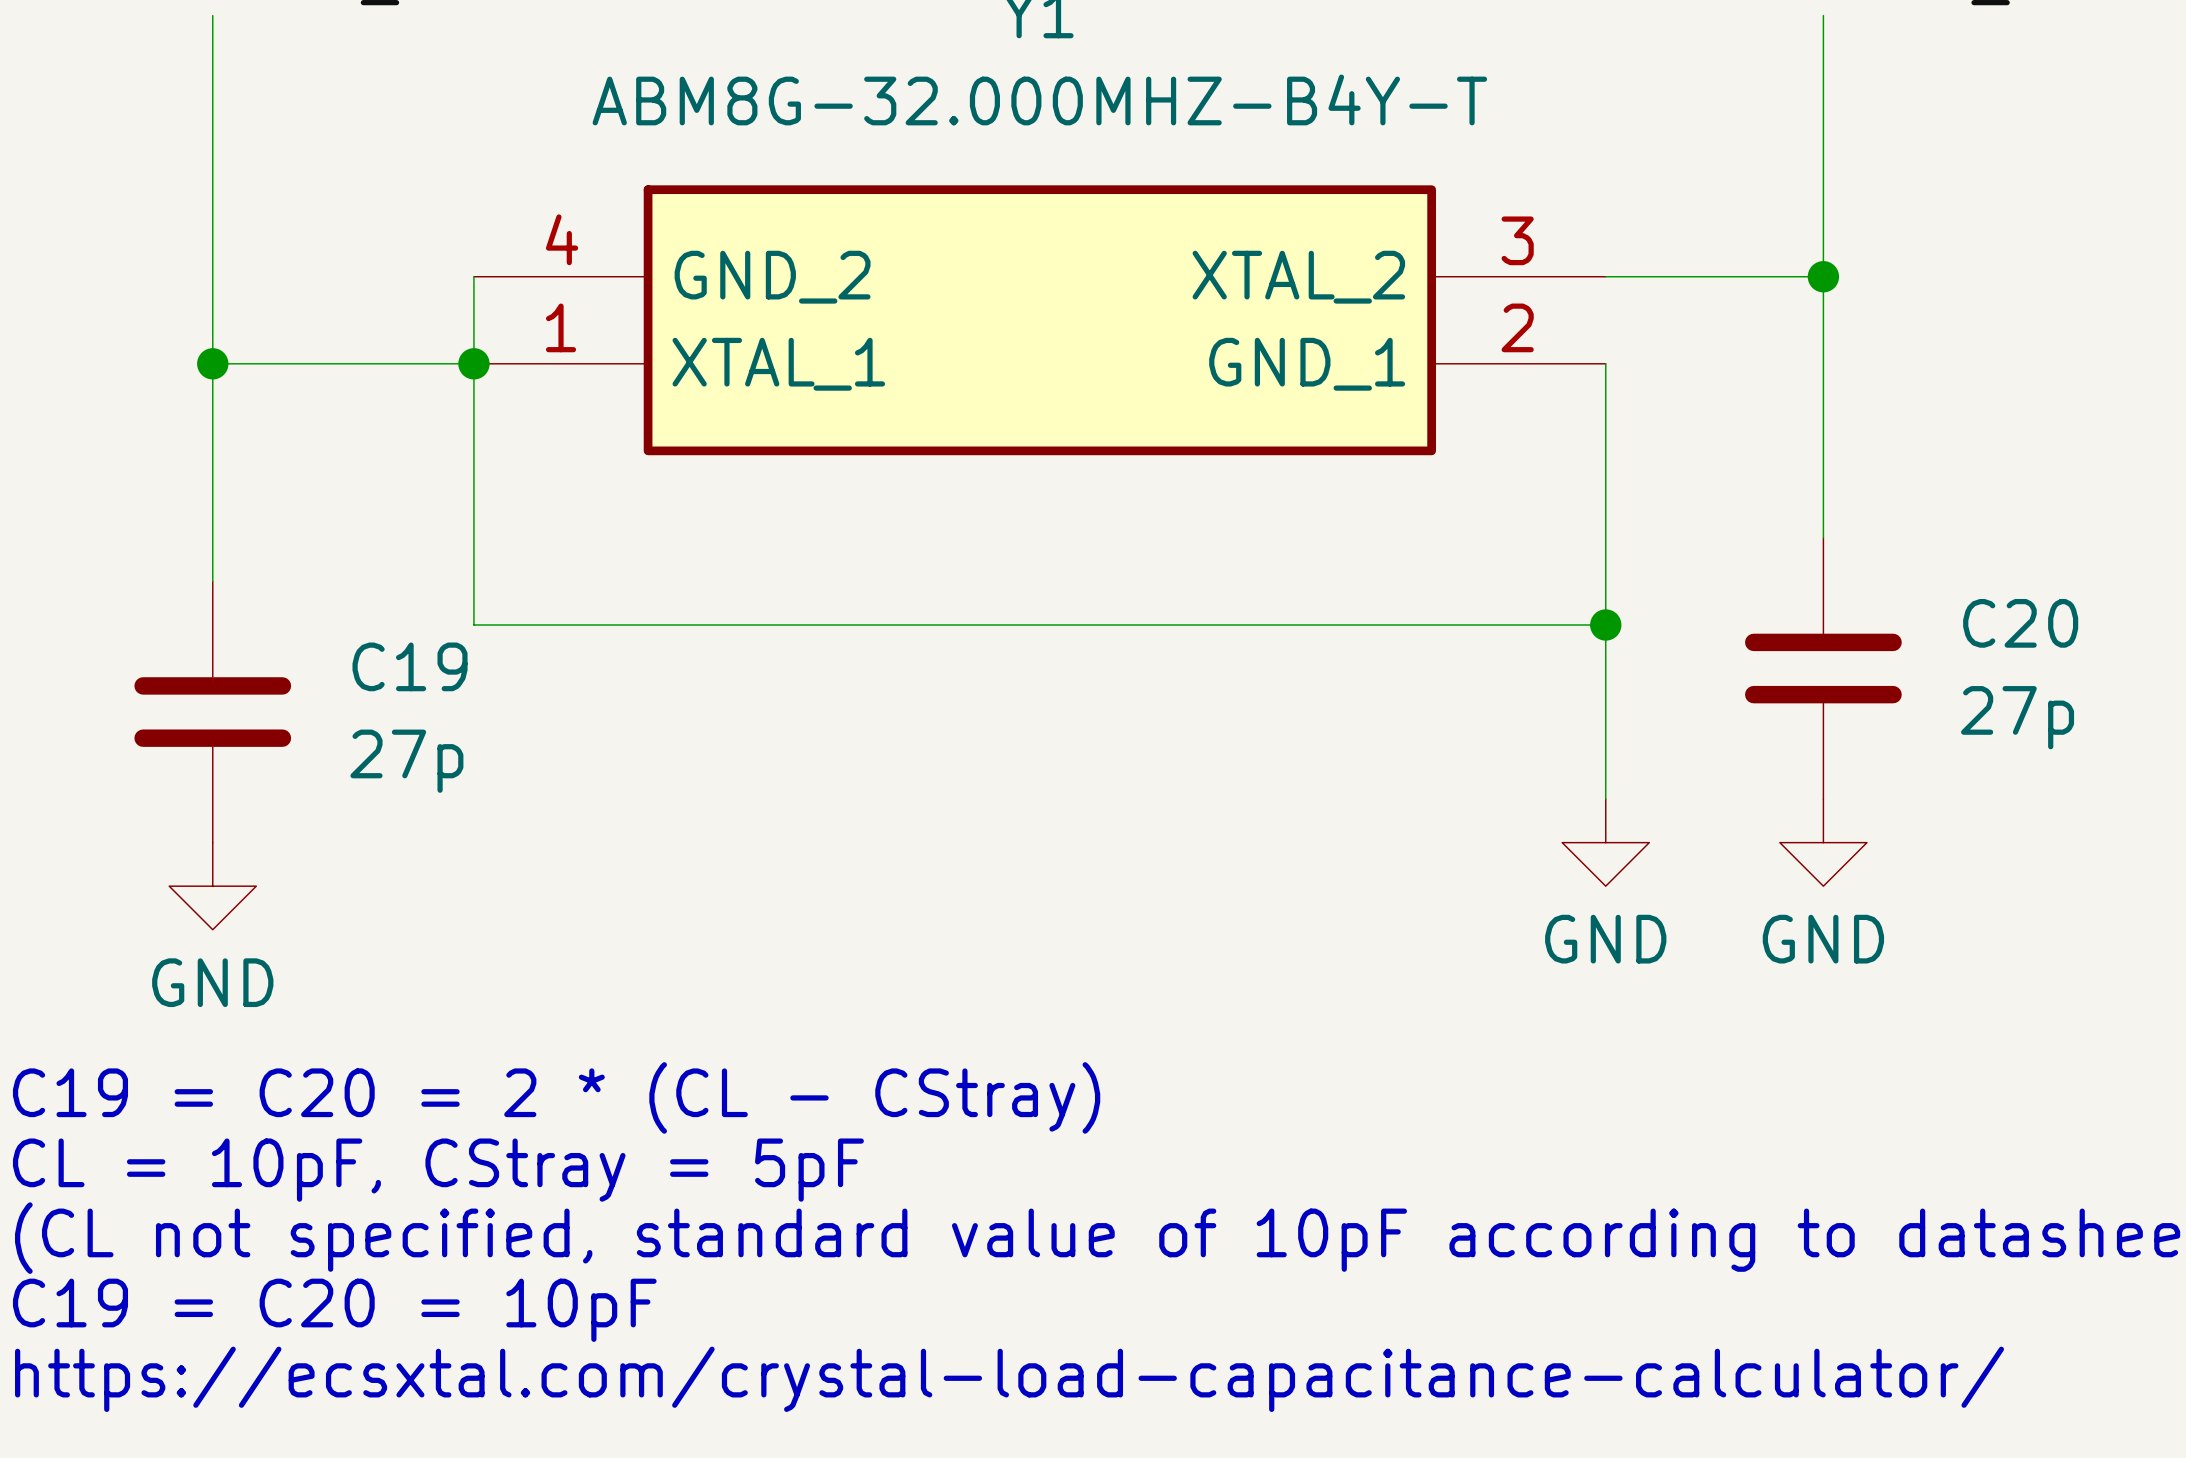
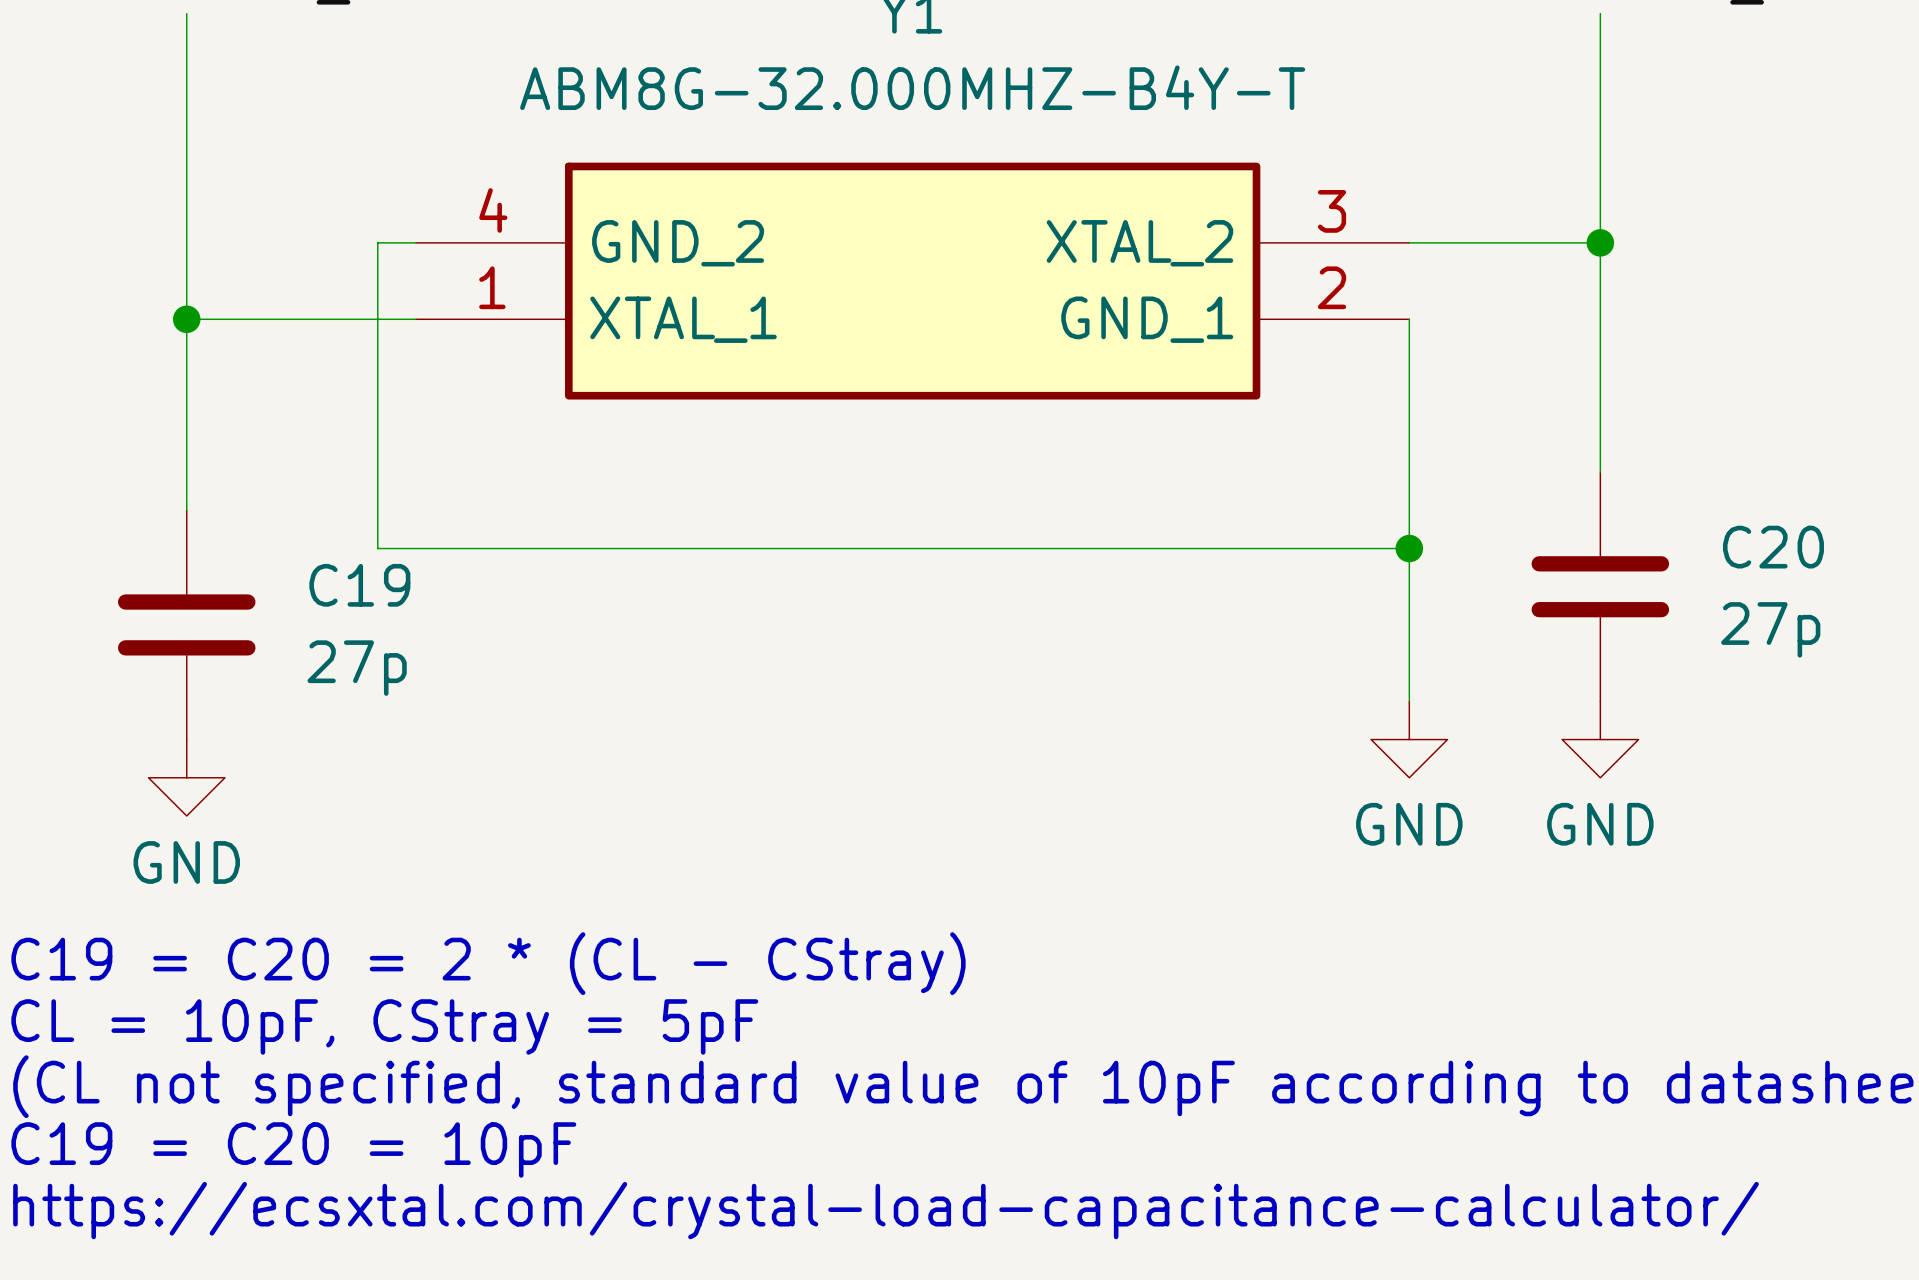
wire: (473, 276) (473, 624) -> (415, 242) (377, 242) (377, 548) (415, 548)
junction: (473, 363) -> none

